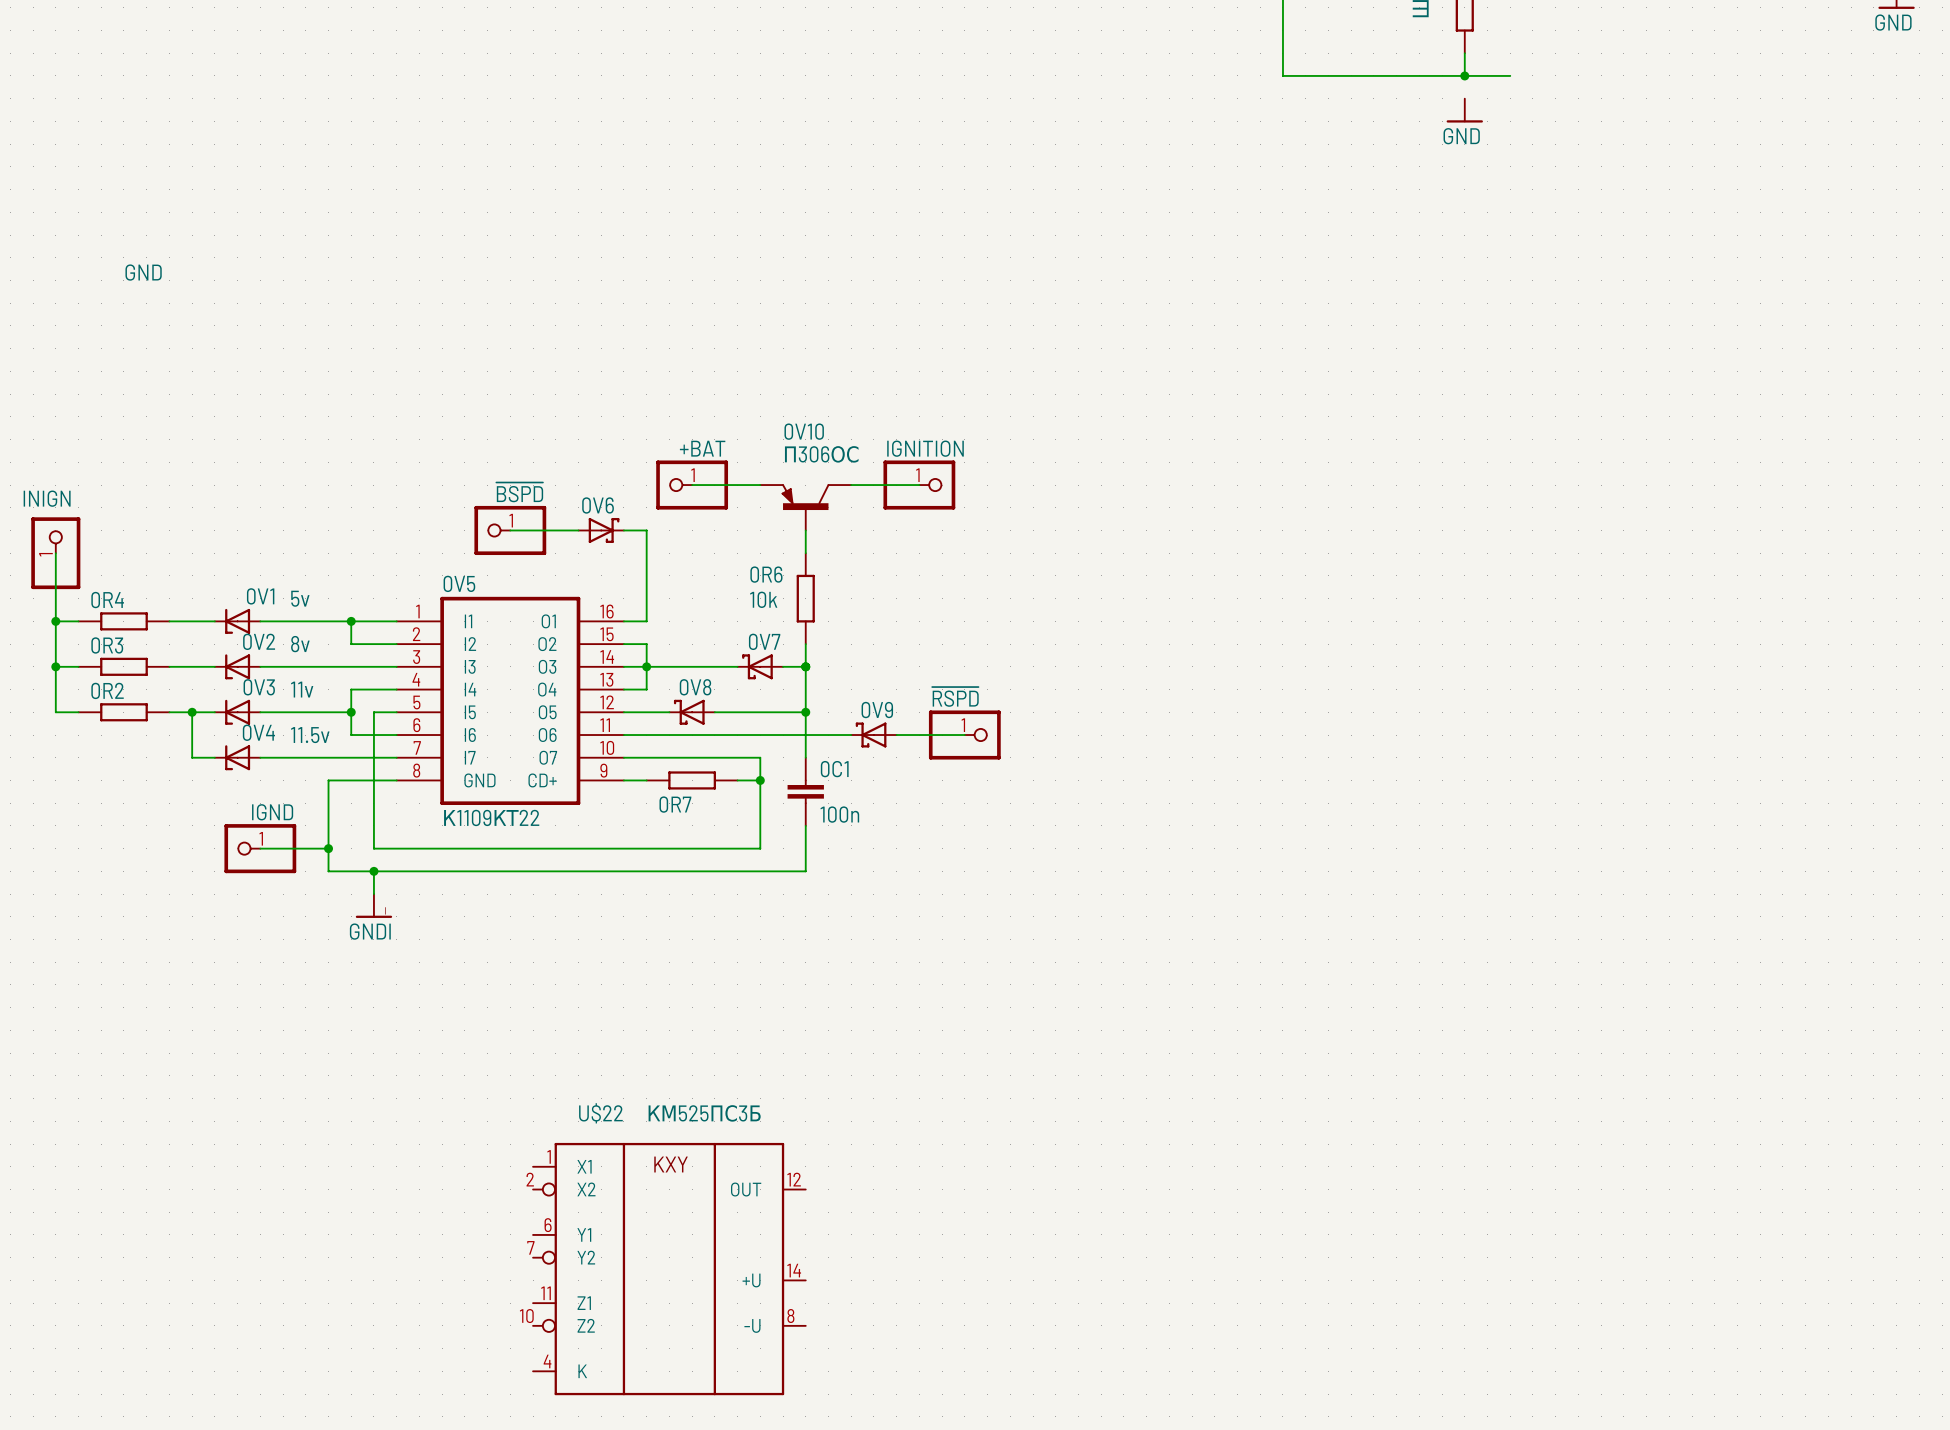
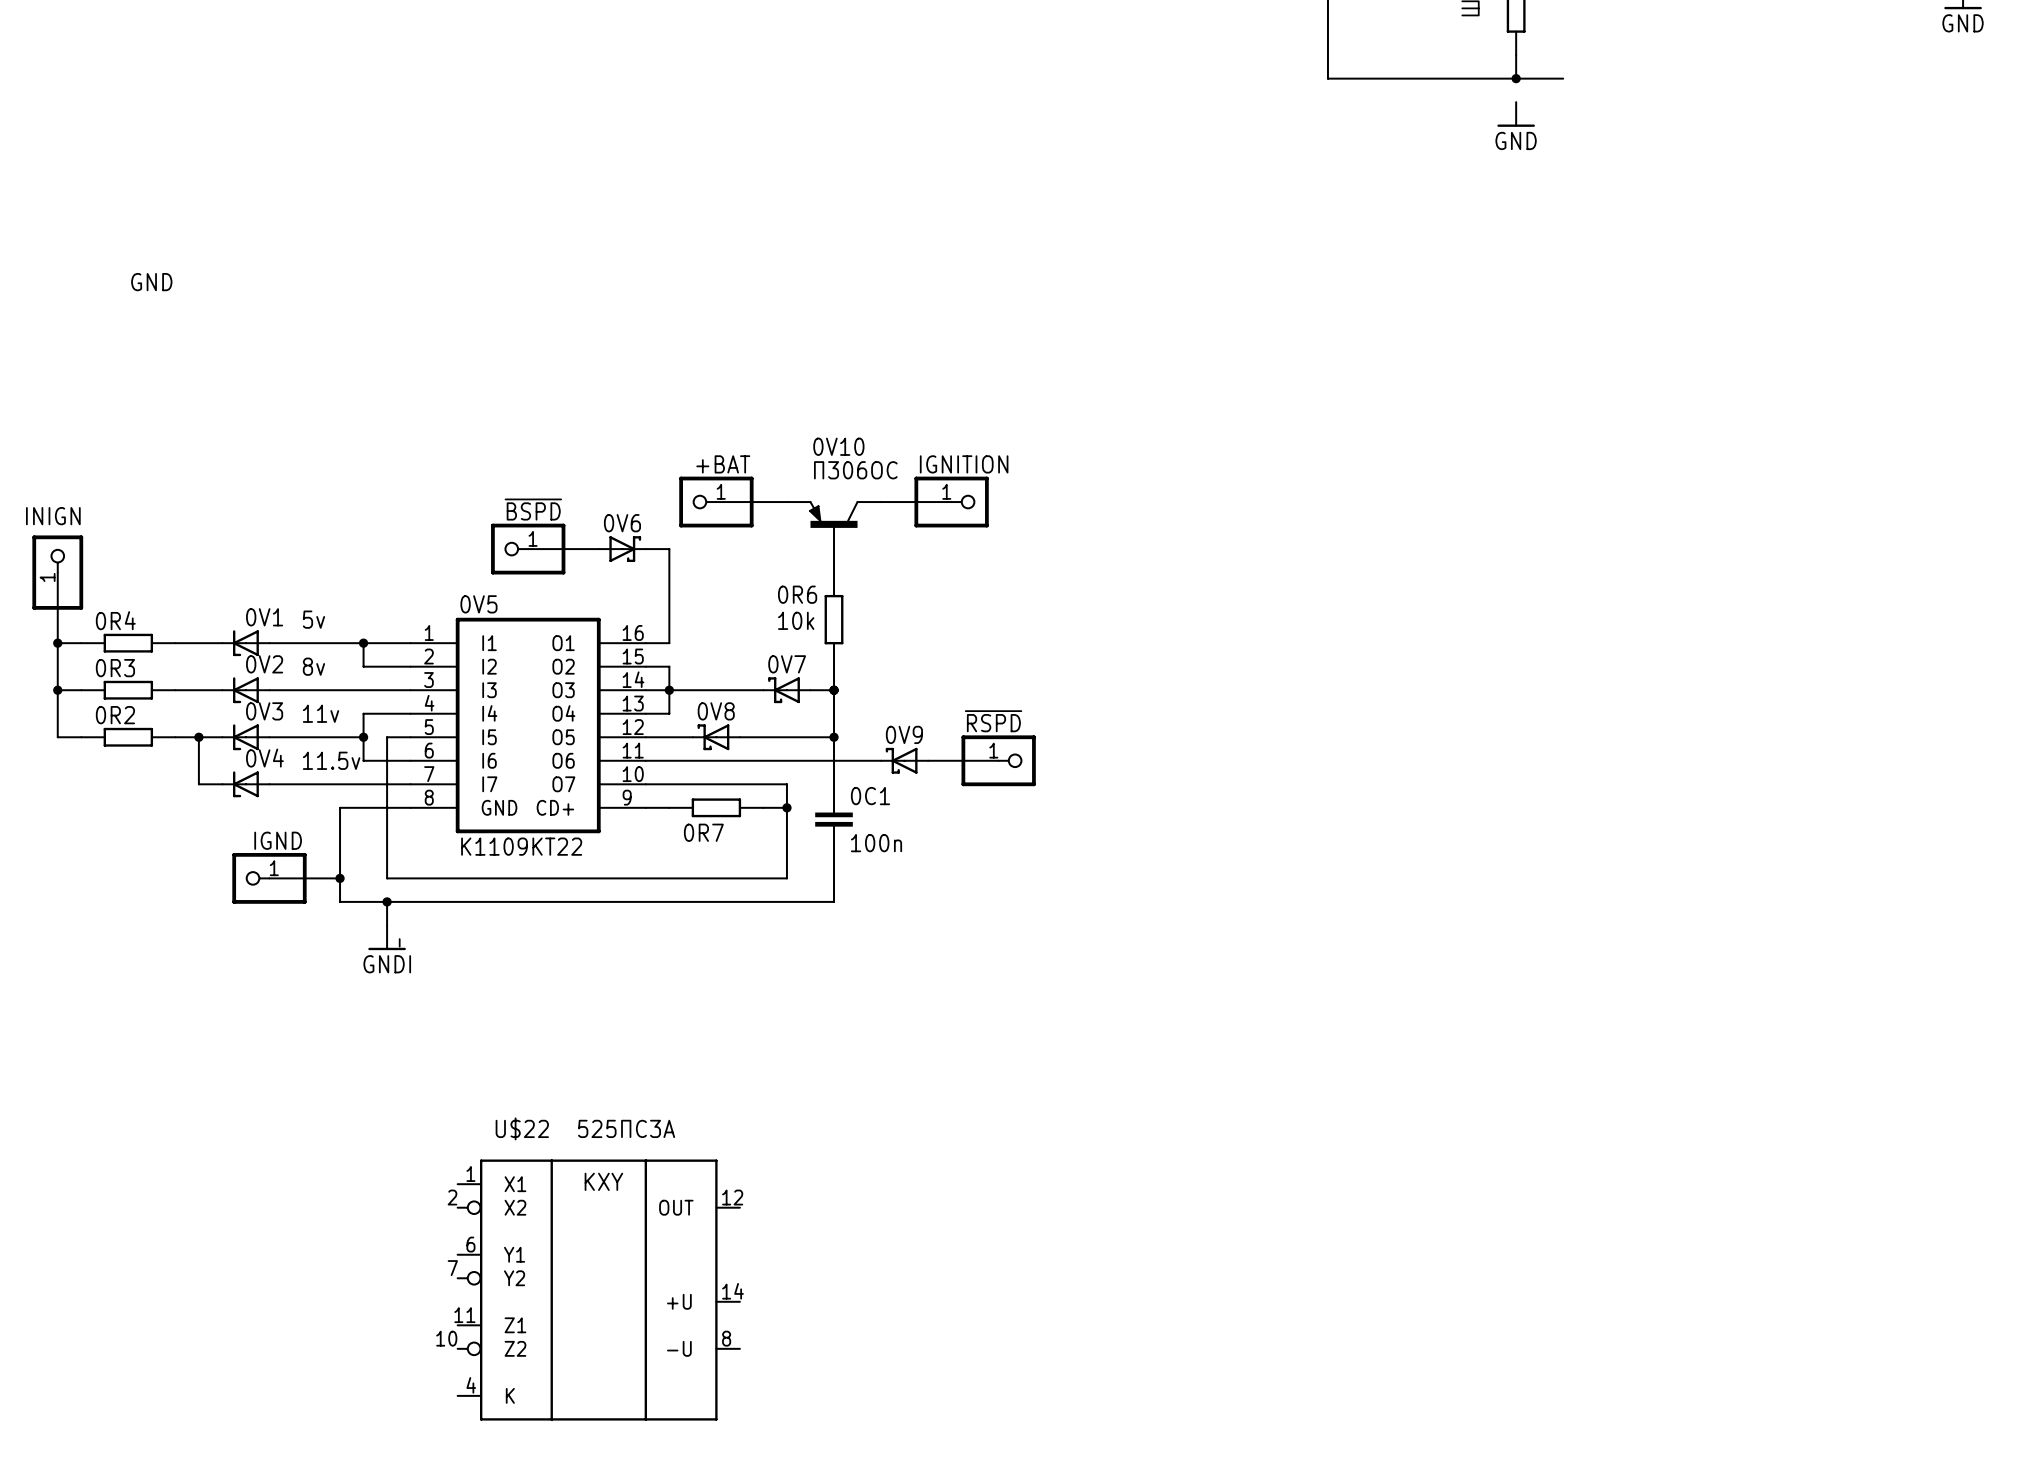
U$22 value: КМ525ПС3Б (704, 1113) -> 525ПС3A (626, 1128)
U$22 position: (669, 1269) -> (598, 1290)

